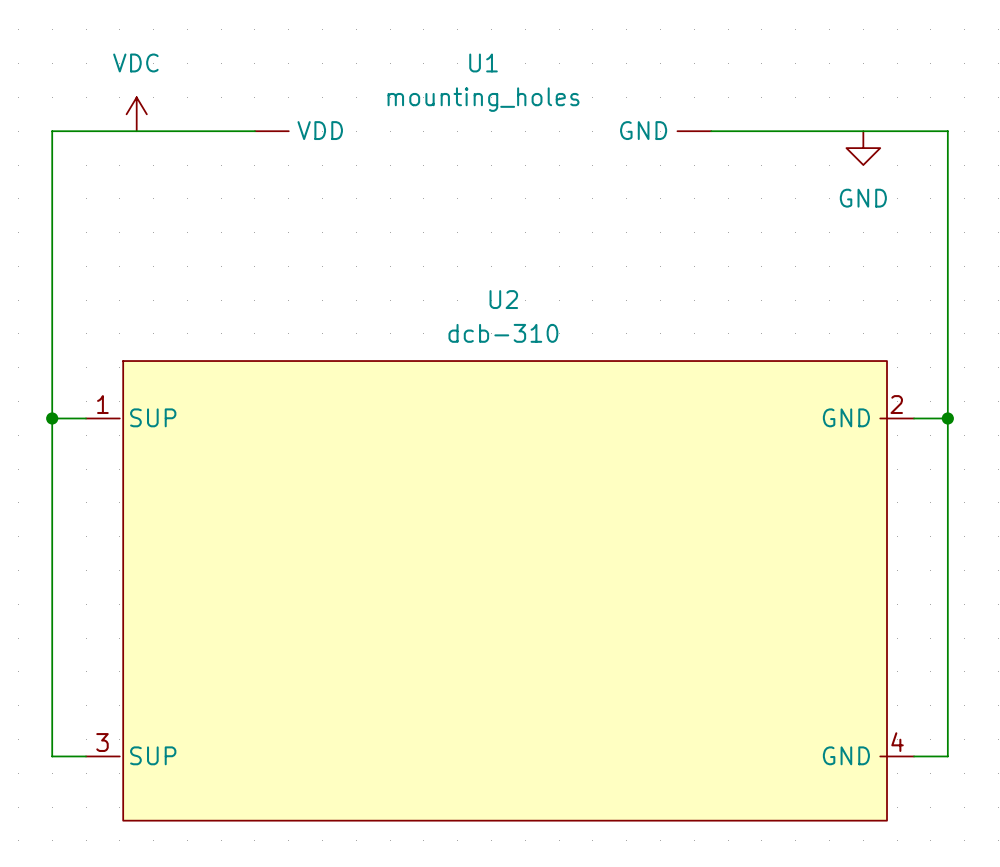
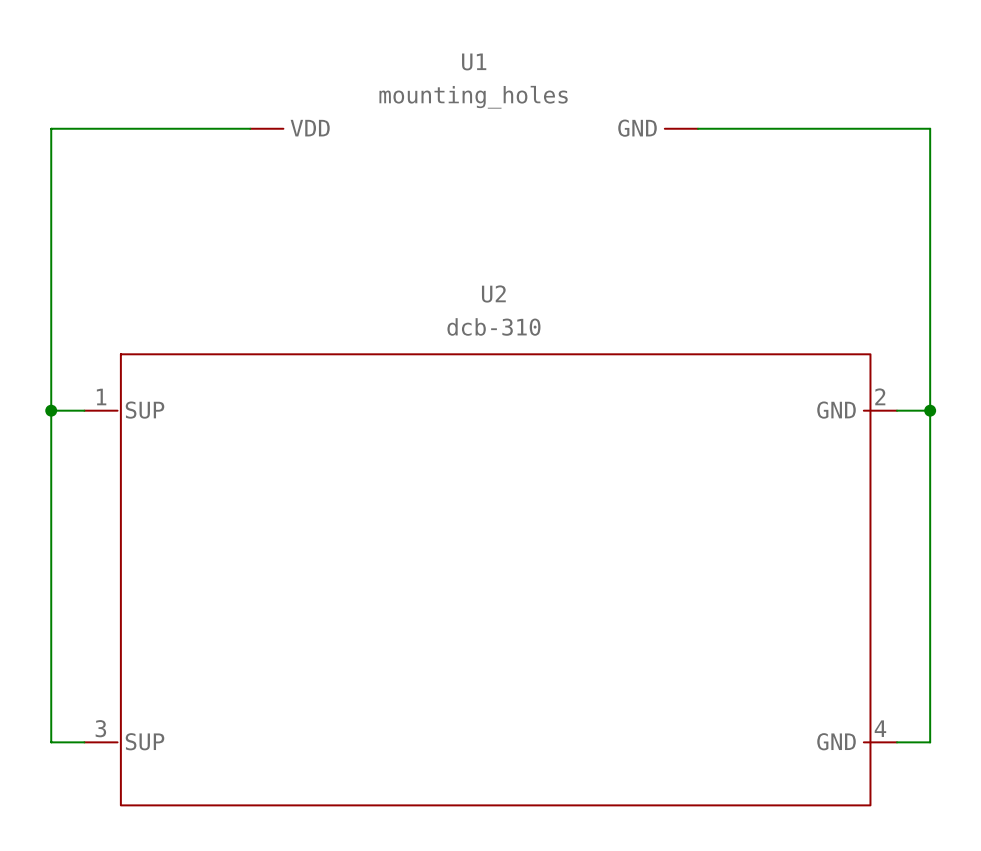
power symbol: VDC (136, 114) -> none
power symbol: GND (863, 148) -> none

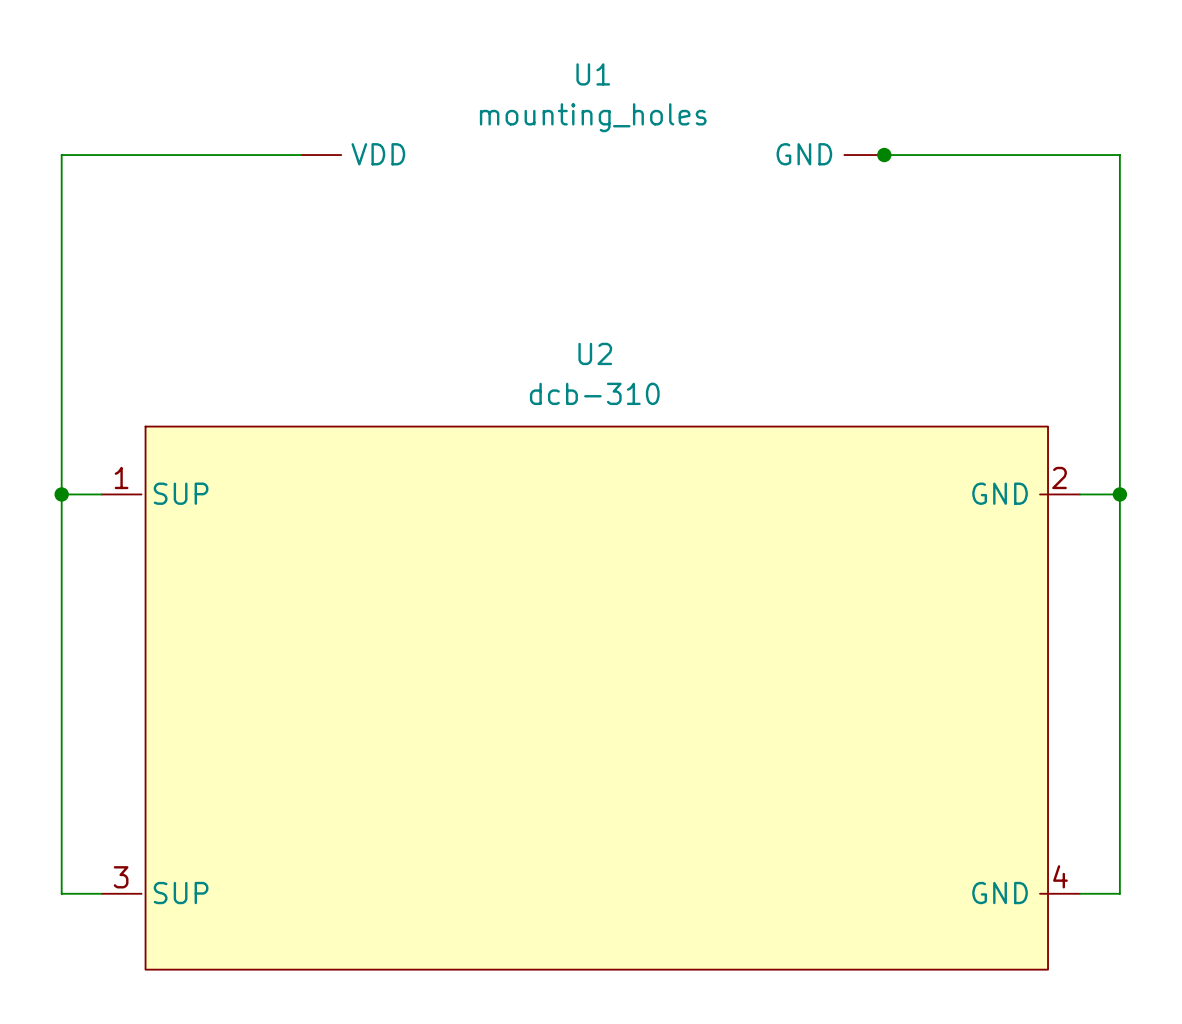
U1 symbol: [250, 128, 698, 129] -> [301, 155, 885, 156]
junction: none -> (884, 155)

